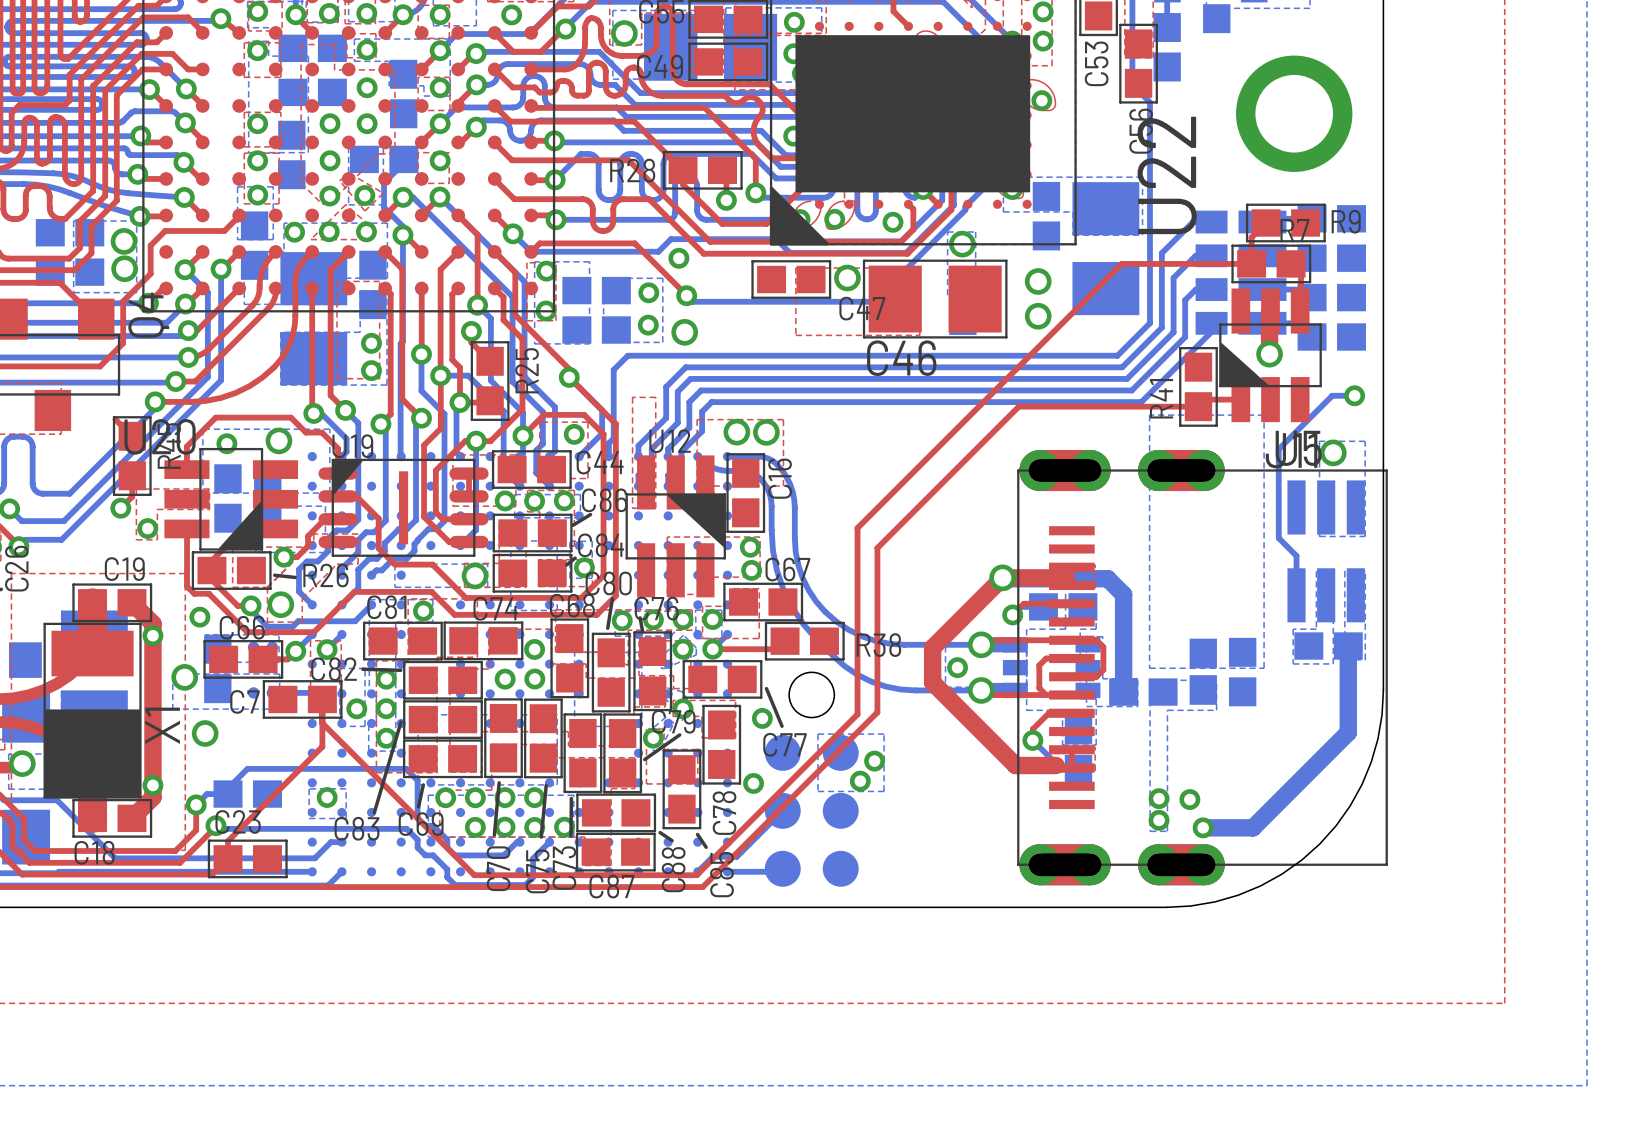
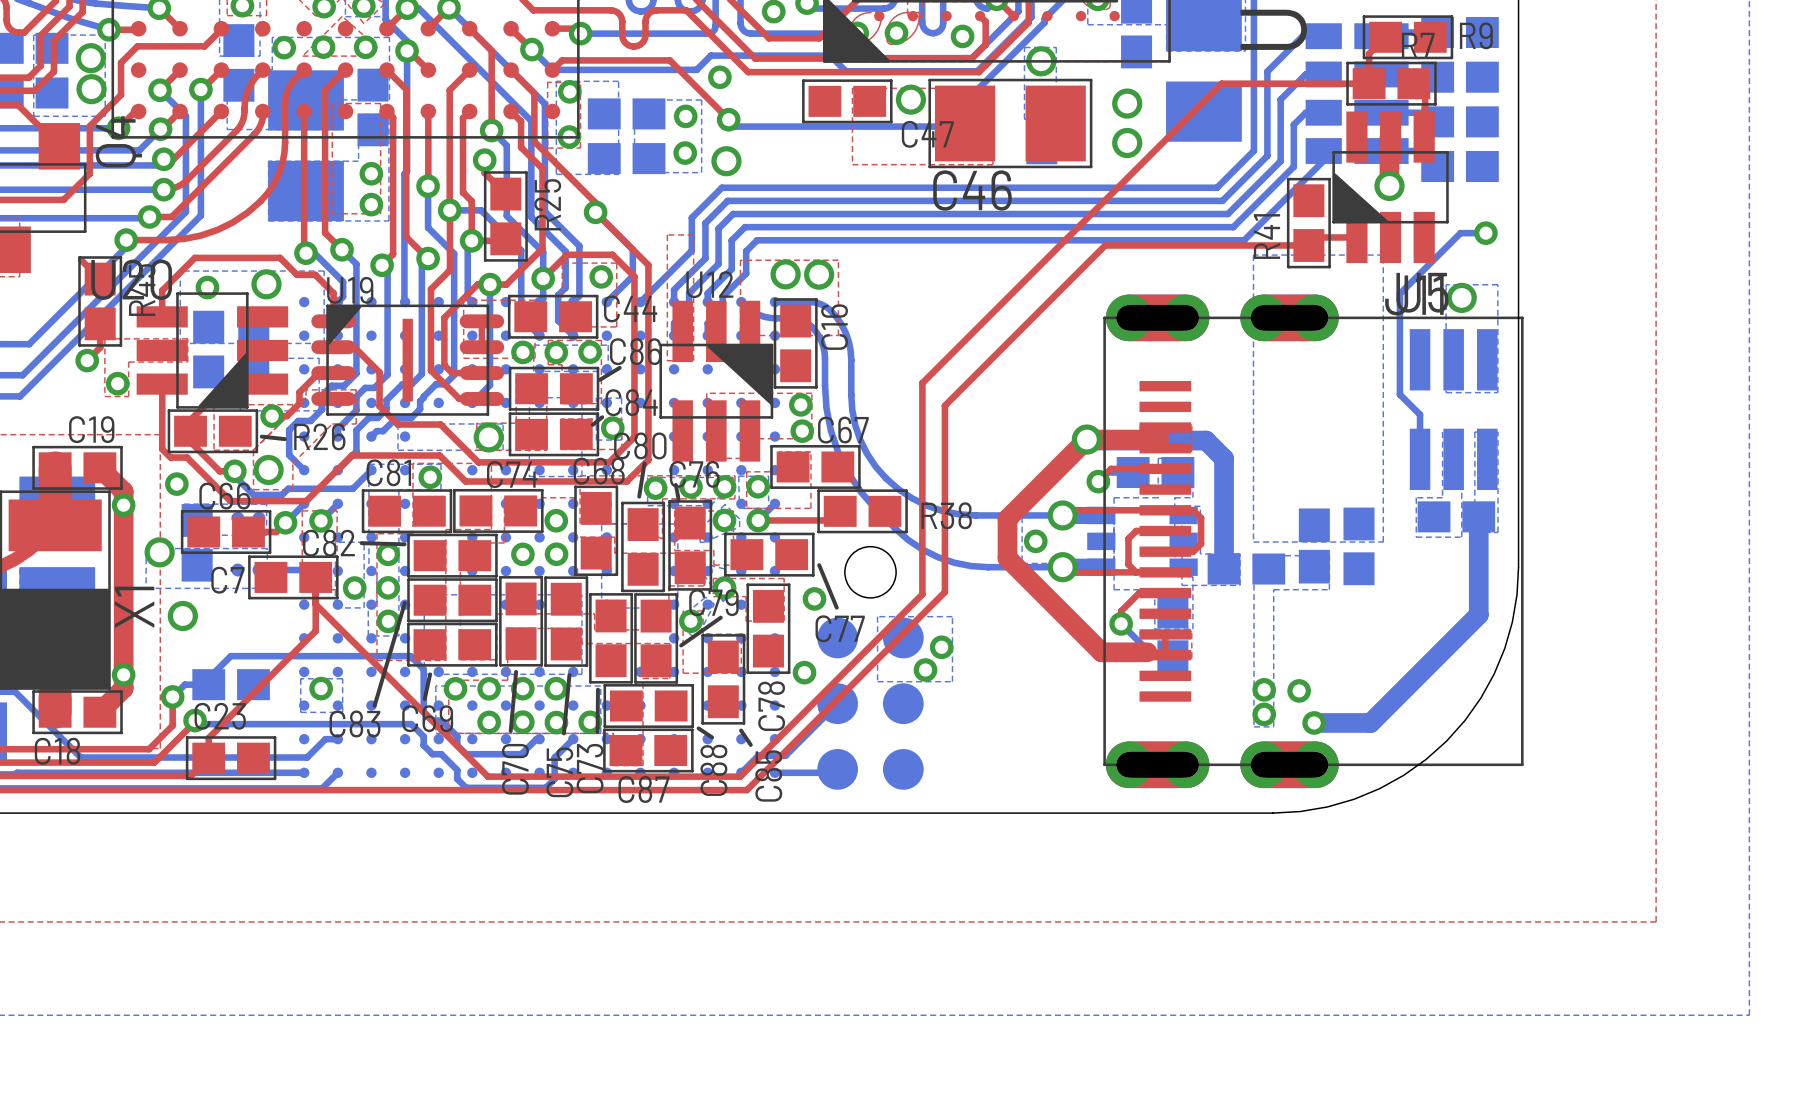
bottom track: (680, 355) (627, 355) (613, 369) (613, 438) (608, 443) (608, 456) -> (721, 187) (691, 217) (691, 250) (640, 302)

